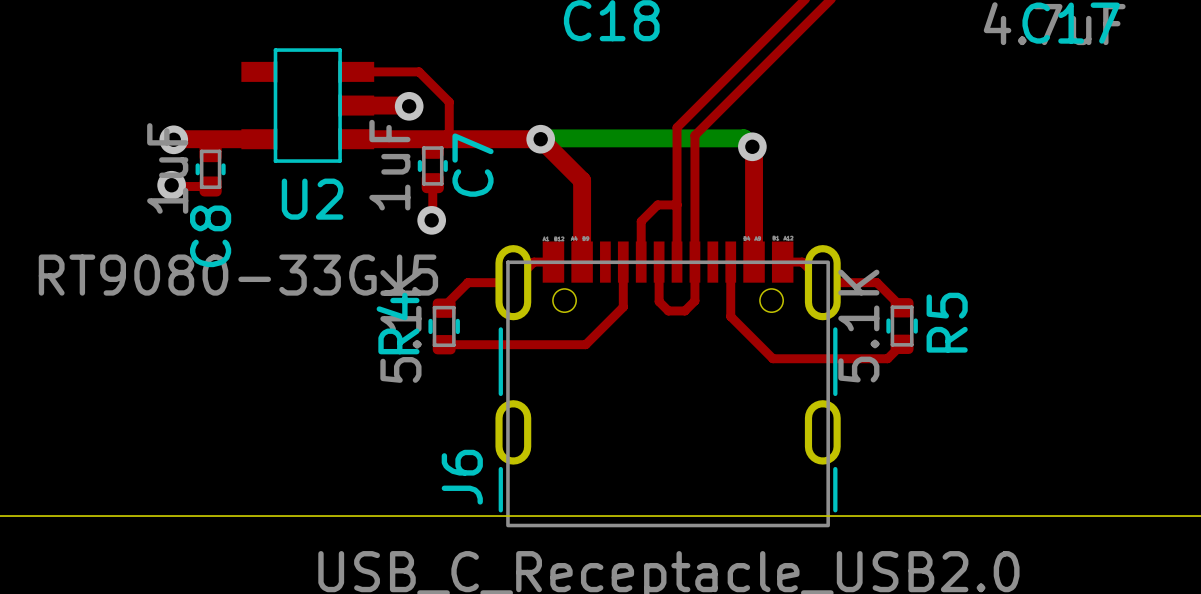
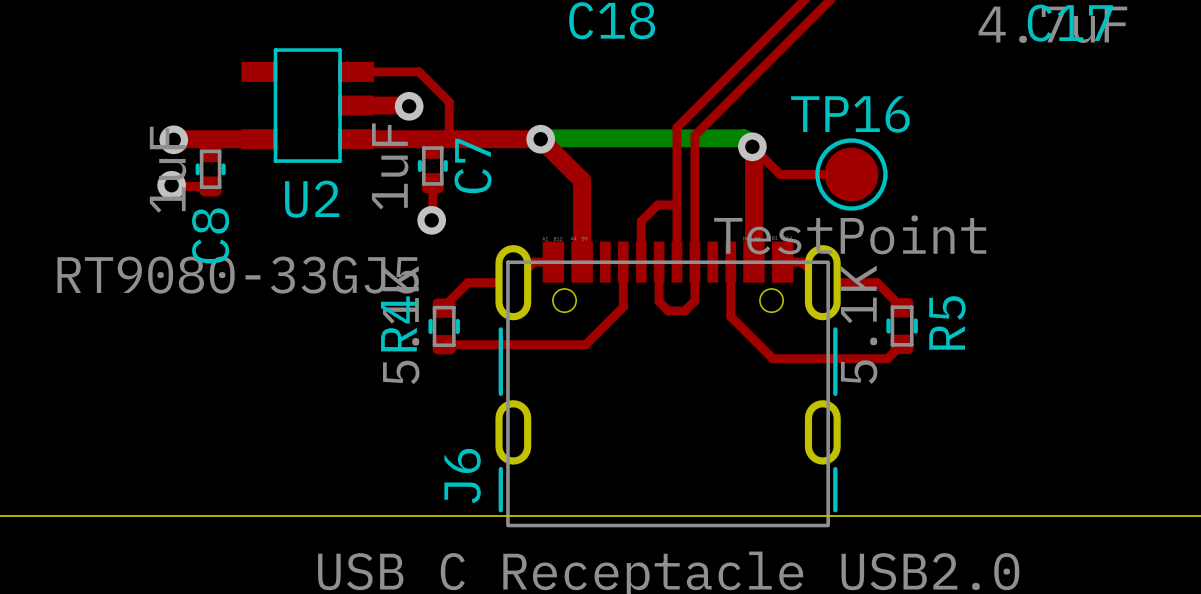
top track: none -> (752, 146) (780, 174) (851, 174)
TP16: none -> TestPoint (851, 174)

